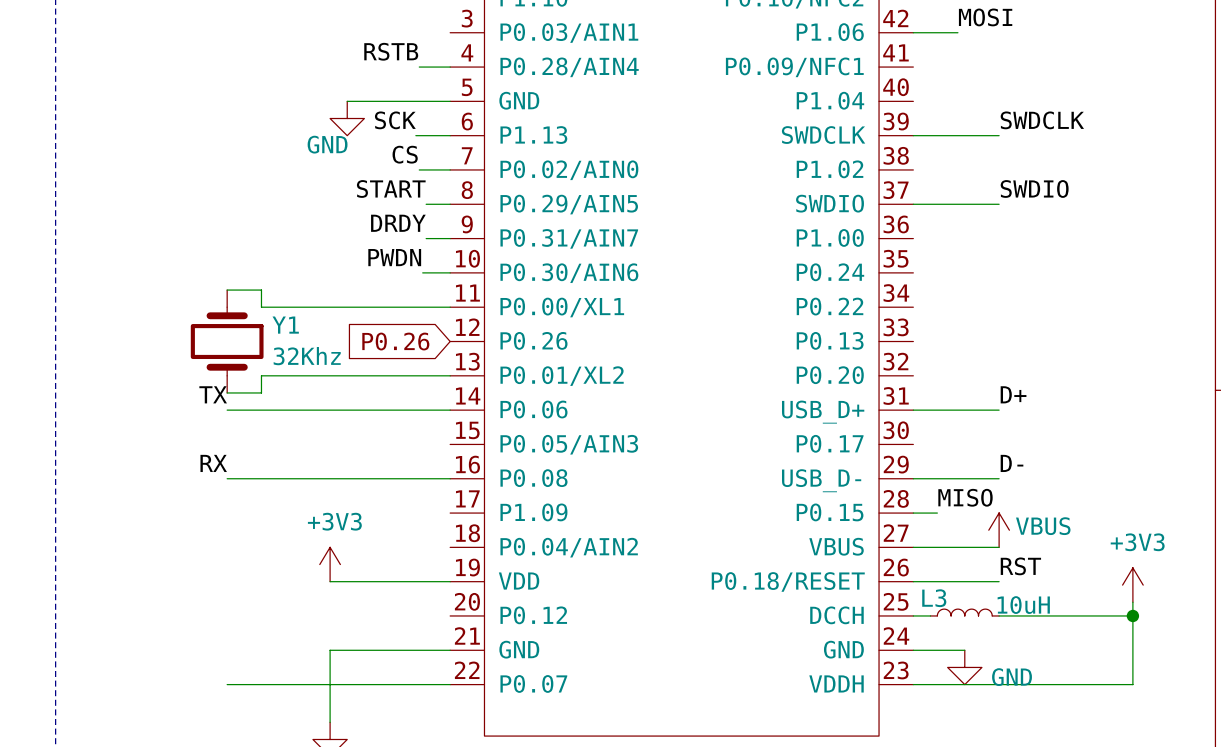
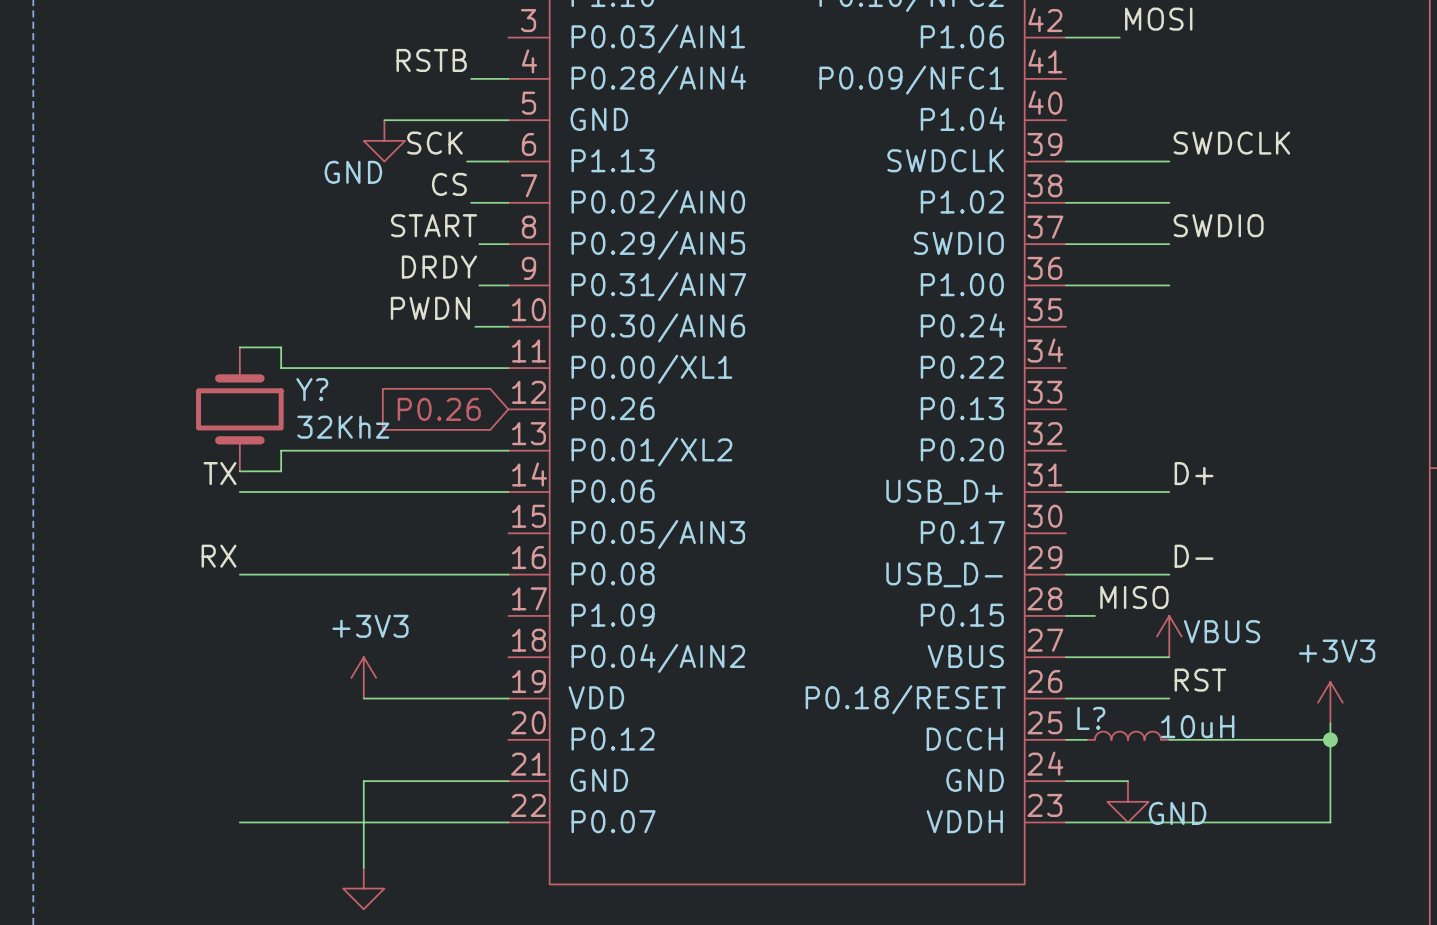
wire: none -> (1066, 202) (1169, 202)
wire: none -> (1066, 285) (1169, 285)
Y1 name: Y1 (285, 325) -> Y? (312, 389)
L3 name: L3 (934, 598) -> L? (1091, 718)

